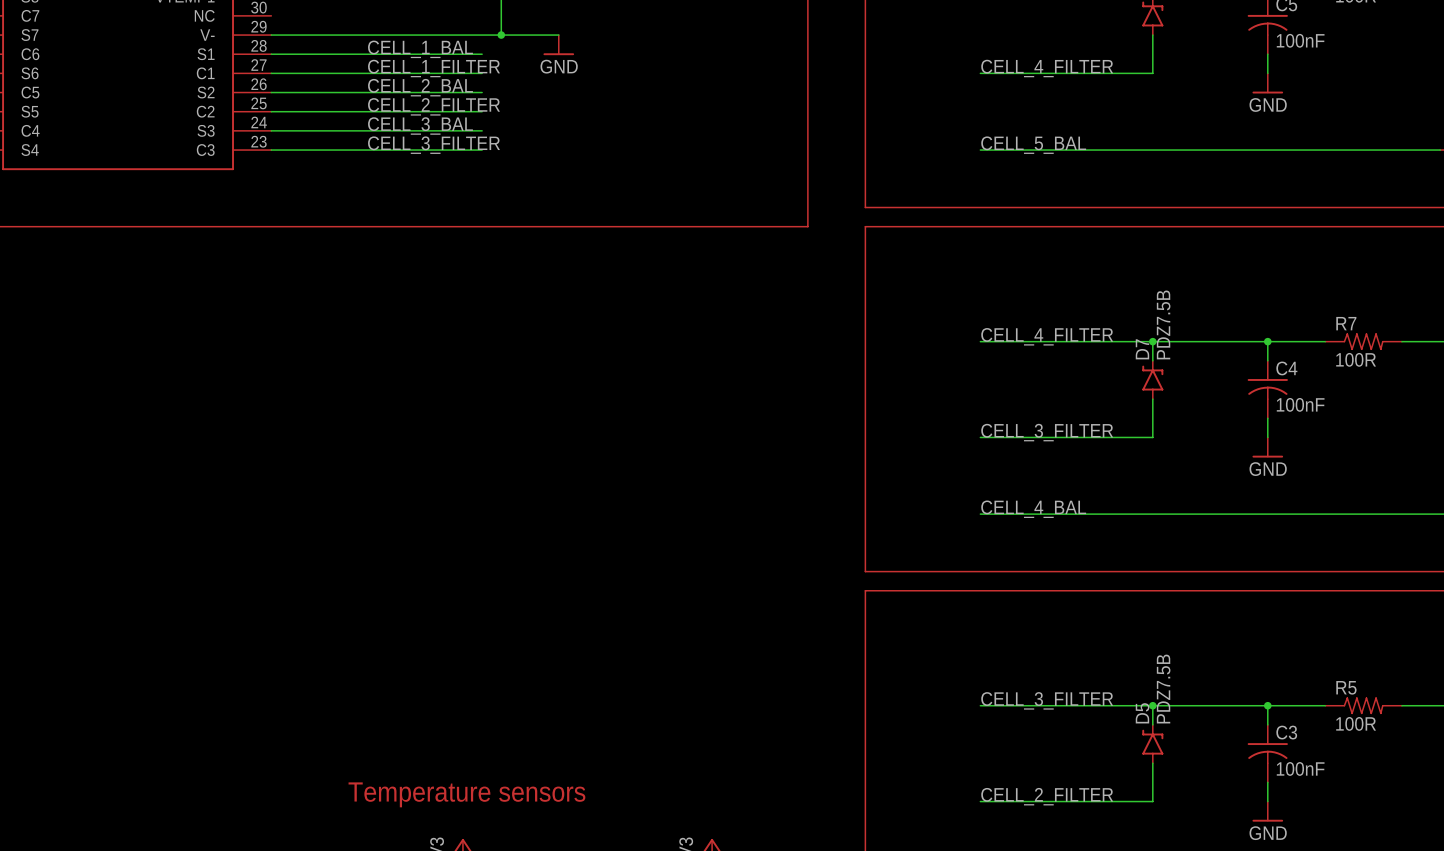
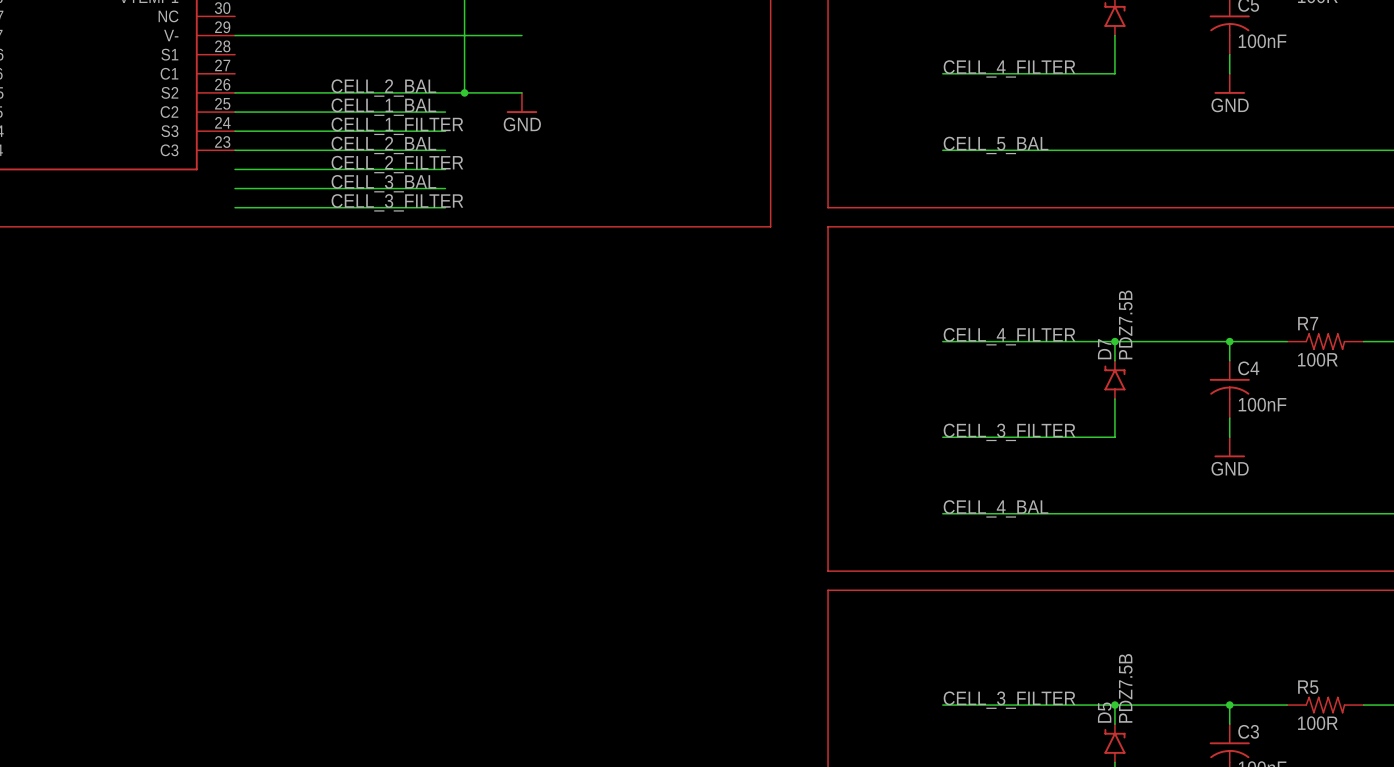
wire: none -> (464, 35) (464, 92)
junction: (501, 35) -> none
power symbol position: GND (558, 45) -> GND (521, 102)
text: CELL_1_BAL (420, 49) -> none
wire: (271, 54) (482, 54) -> (235, 169) (445, 169)
text: CELL_1_FILTER (434, 68) -> none
wire: (271, 73) (482, 73) -> (235, 188) (445, 188)
wire: none -> (445, 92) (521, 92)
junction: none -> (464, 92)
text: CELL_2_FILTER (434, 106) -> CELL_1_BAL (383, 107)
text: CELL_3_BAL (420, 125) -> CELL_1_FILTER (397, 126)
text: CELL_3_FILTER (434, 145) -> CELL_2_BAL (383, 145)
text: none -> CELL_2_FILTER (397, 164)
text: none -> CELL_3_BAL (383, 183)
text: none -> CELL_3_FILTER (397, 202)
wire: none -> (235, 207) (445, 207)

